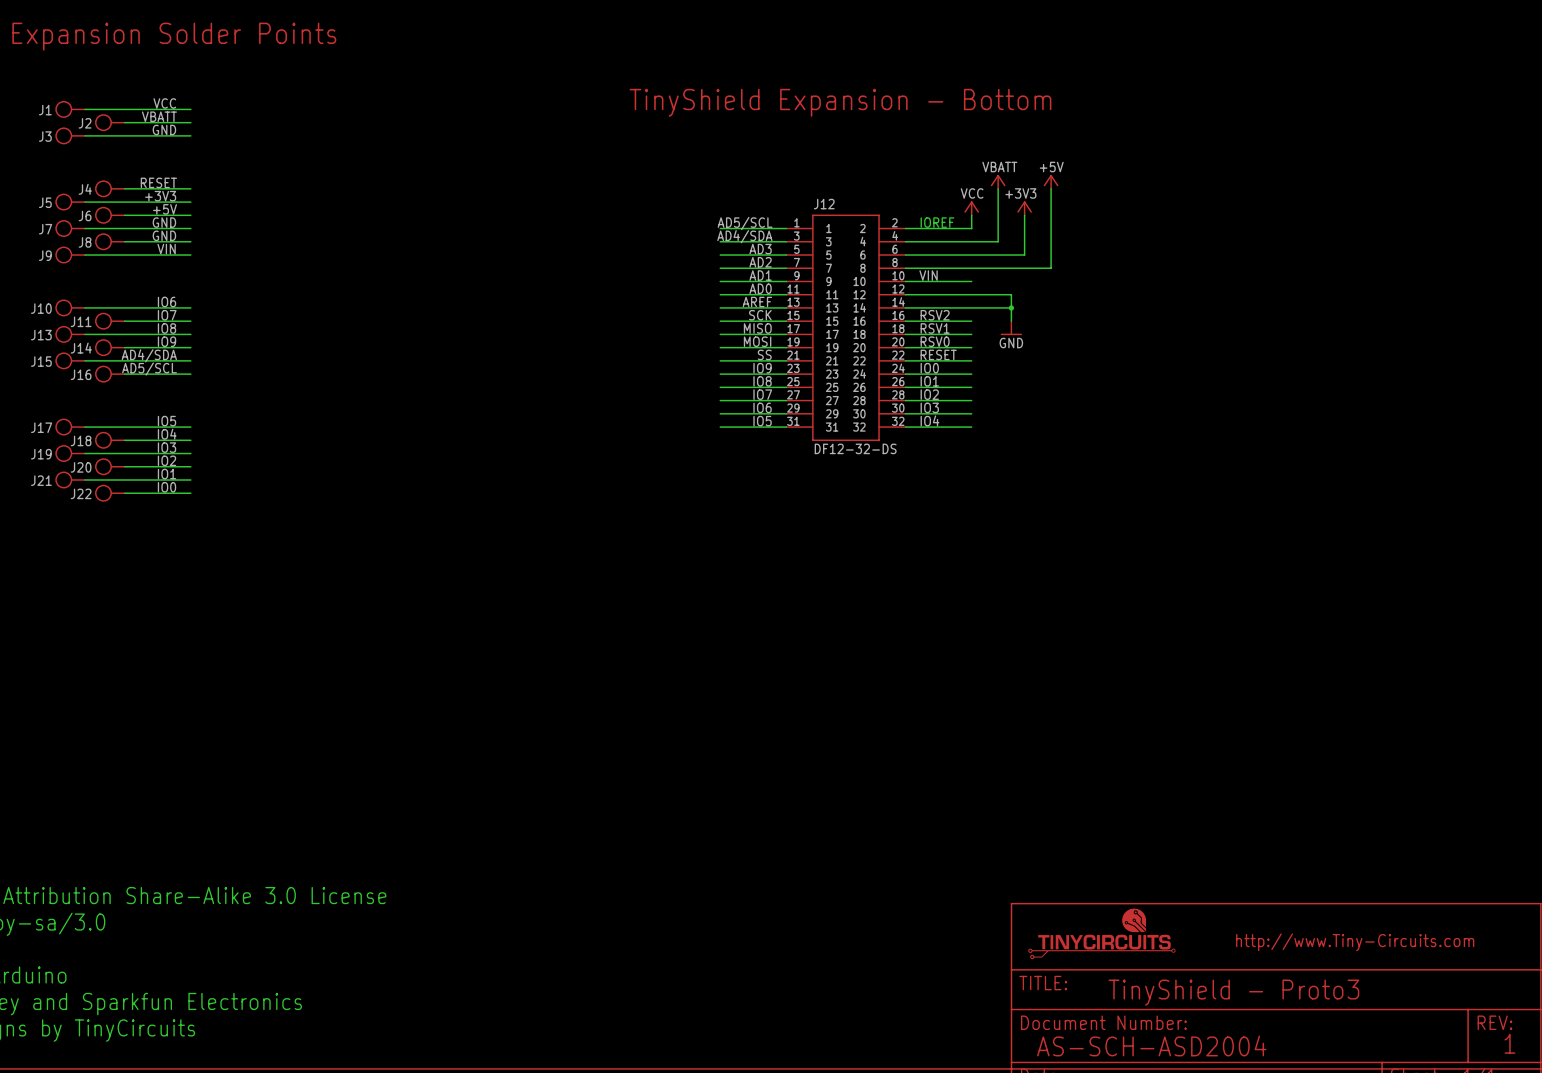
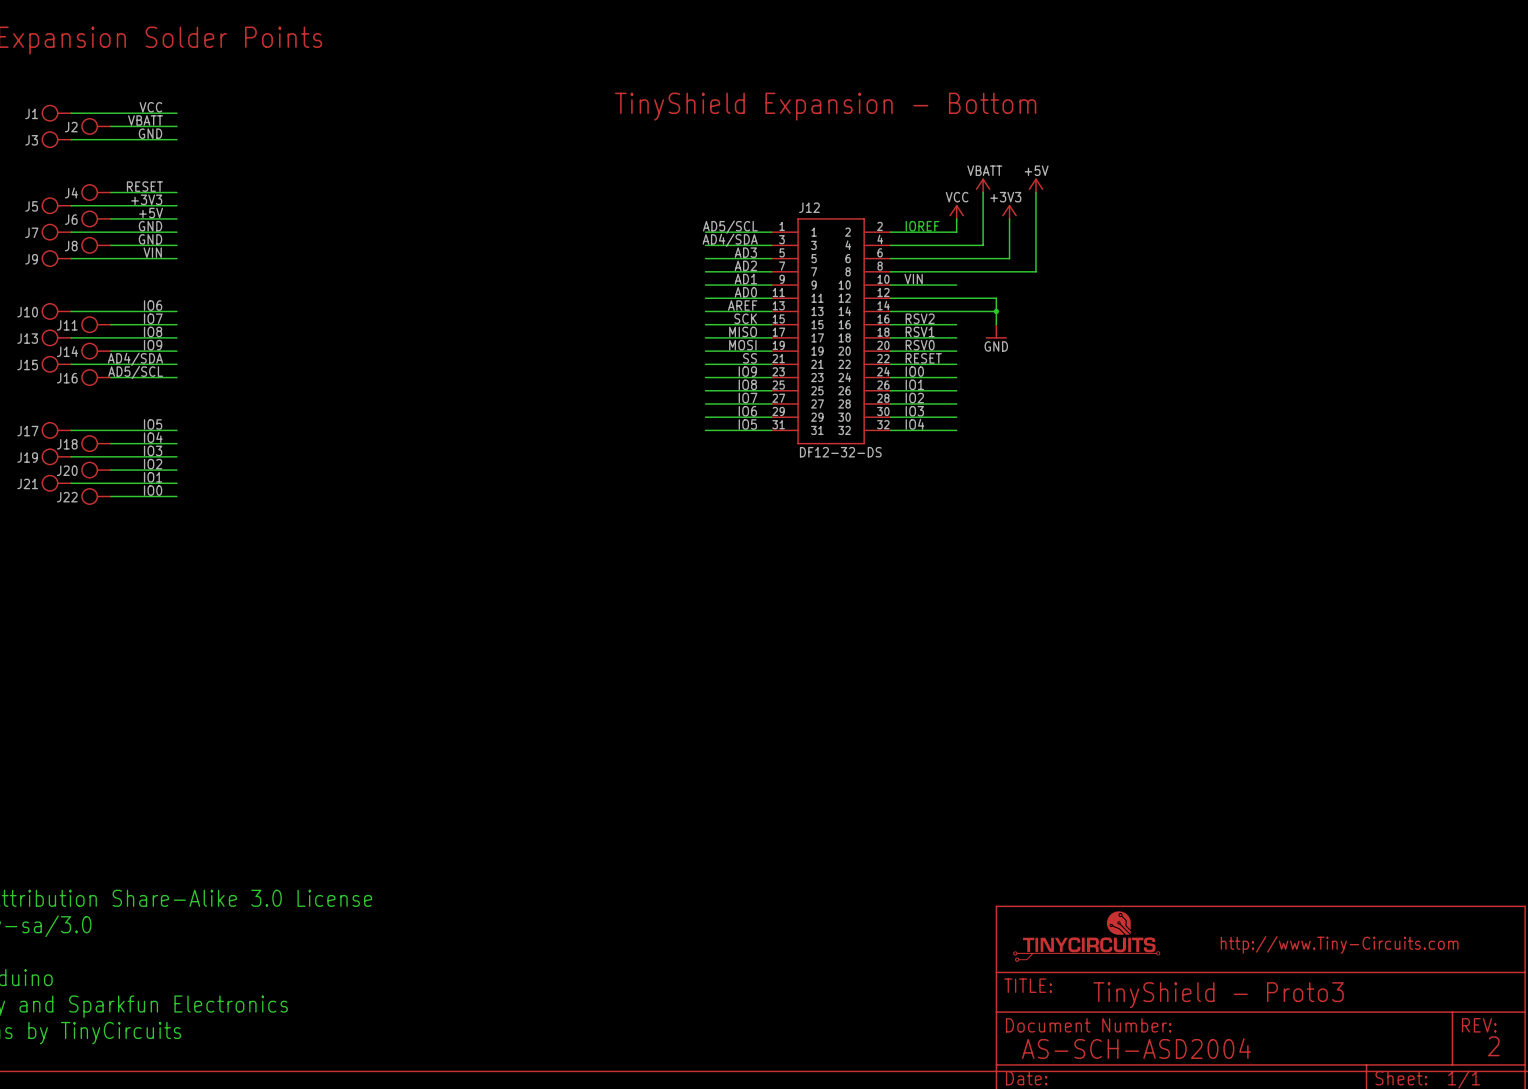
text: 1 (1509, 1043) -> 2 (1493, 1046)

